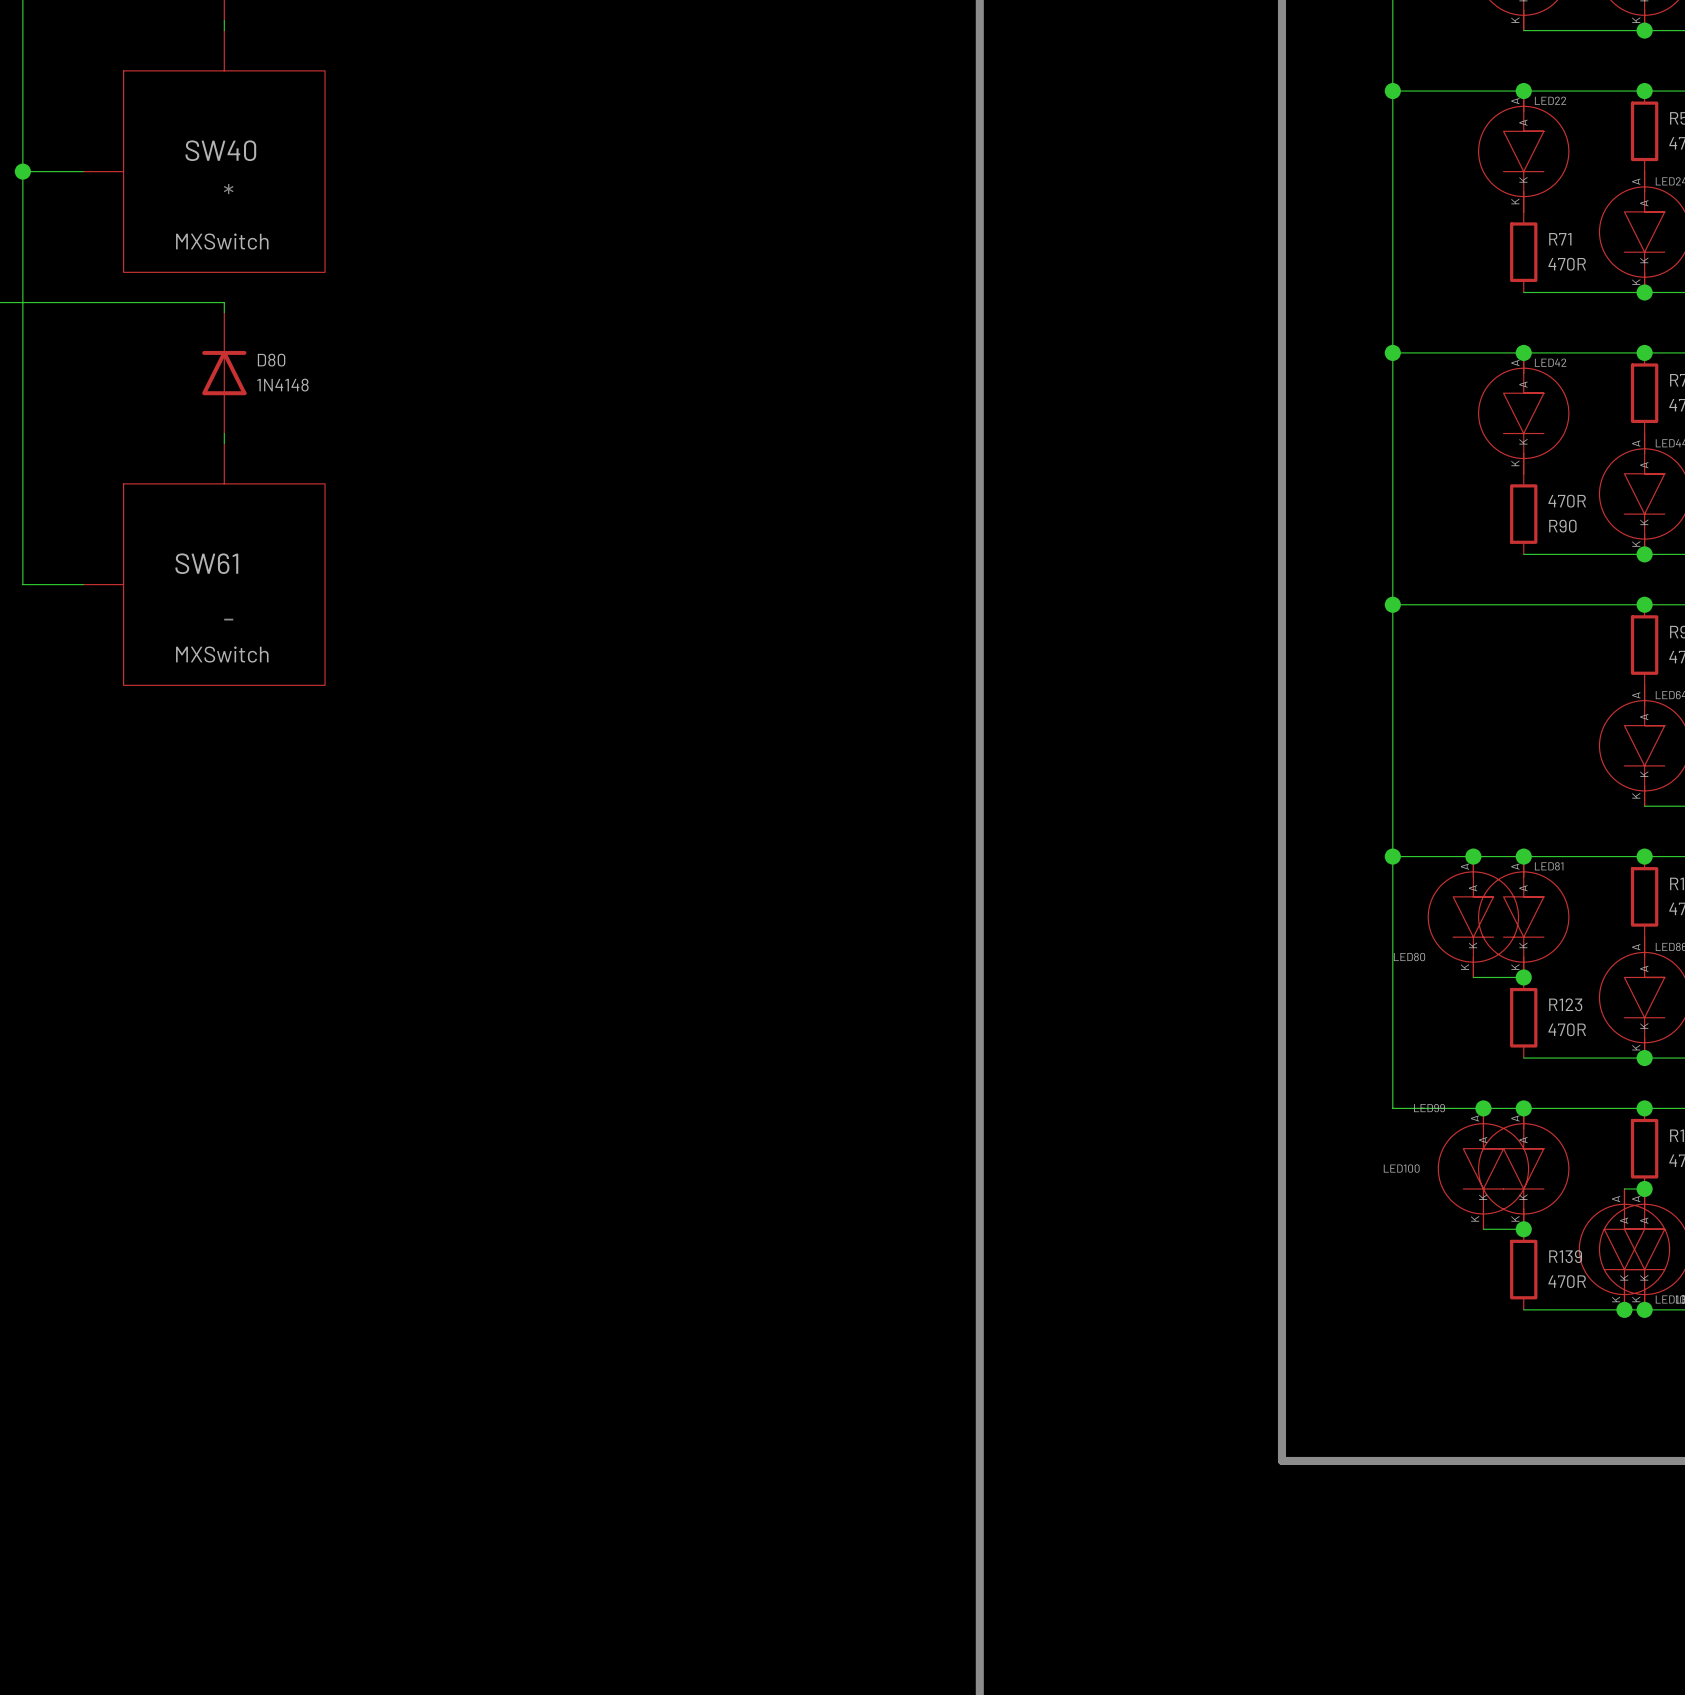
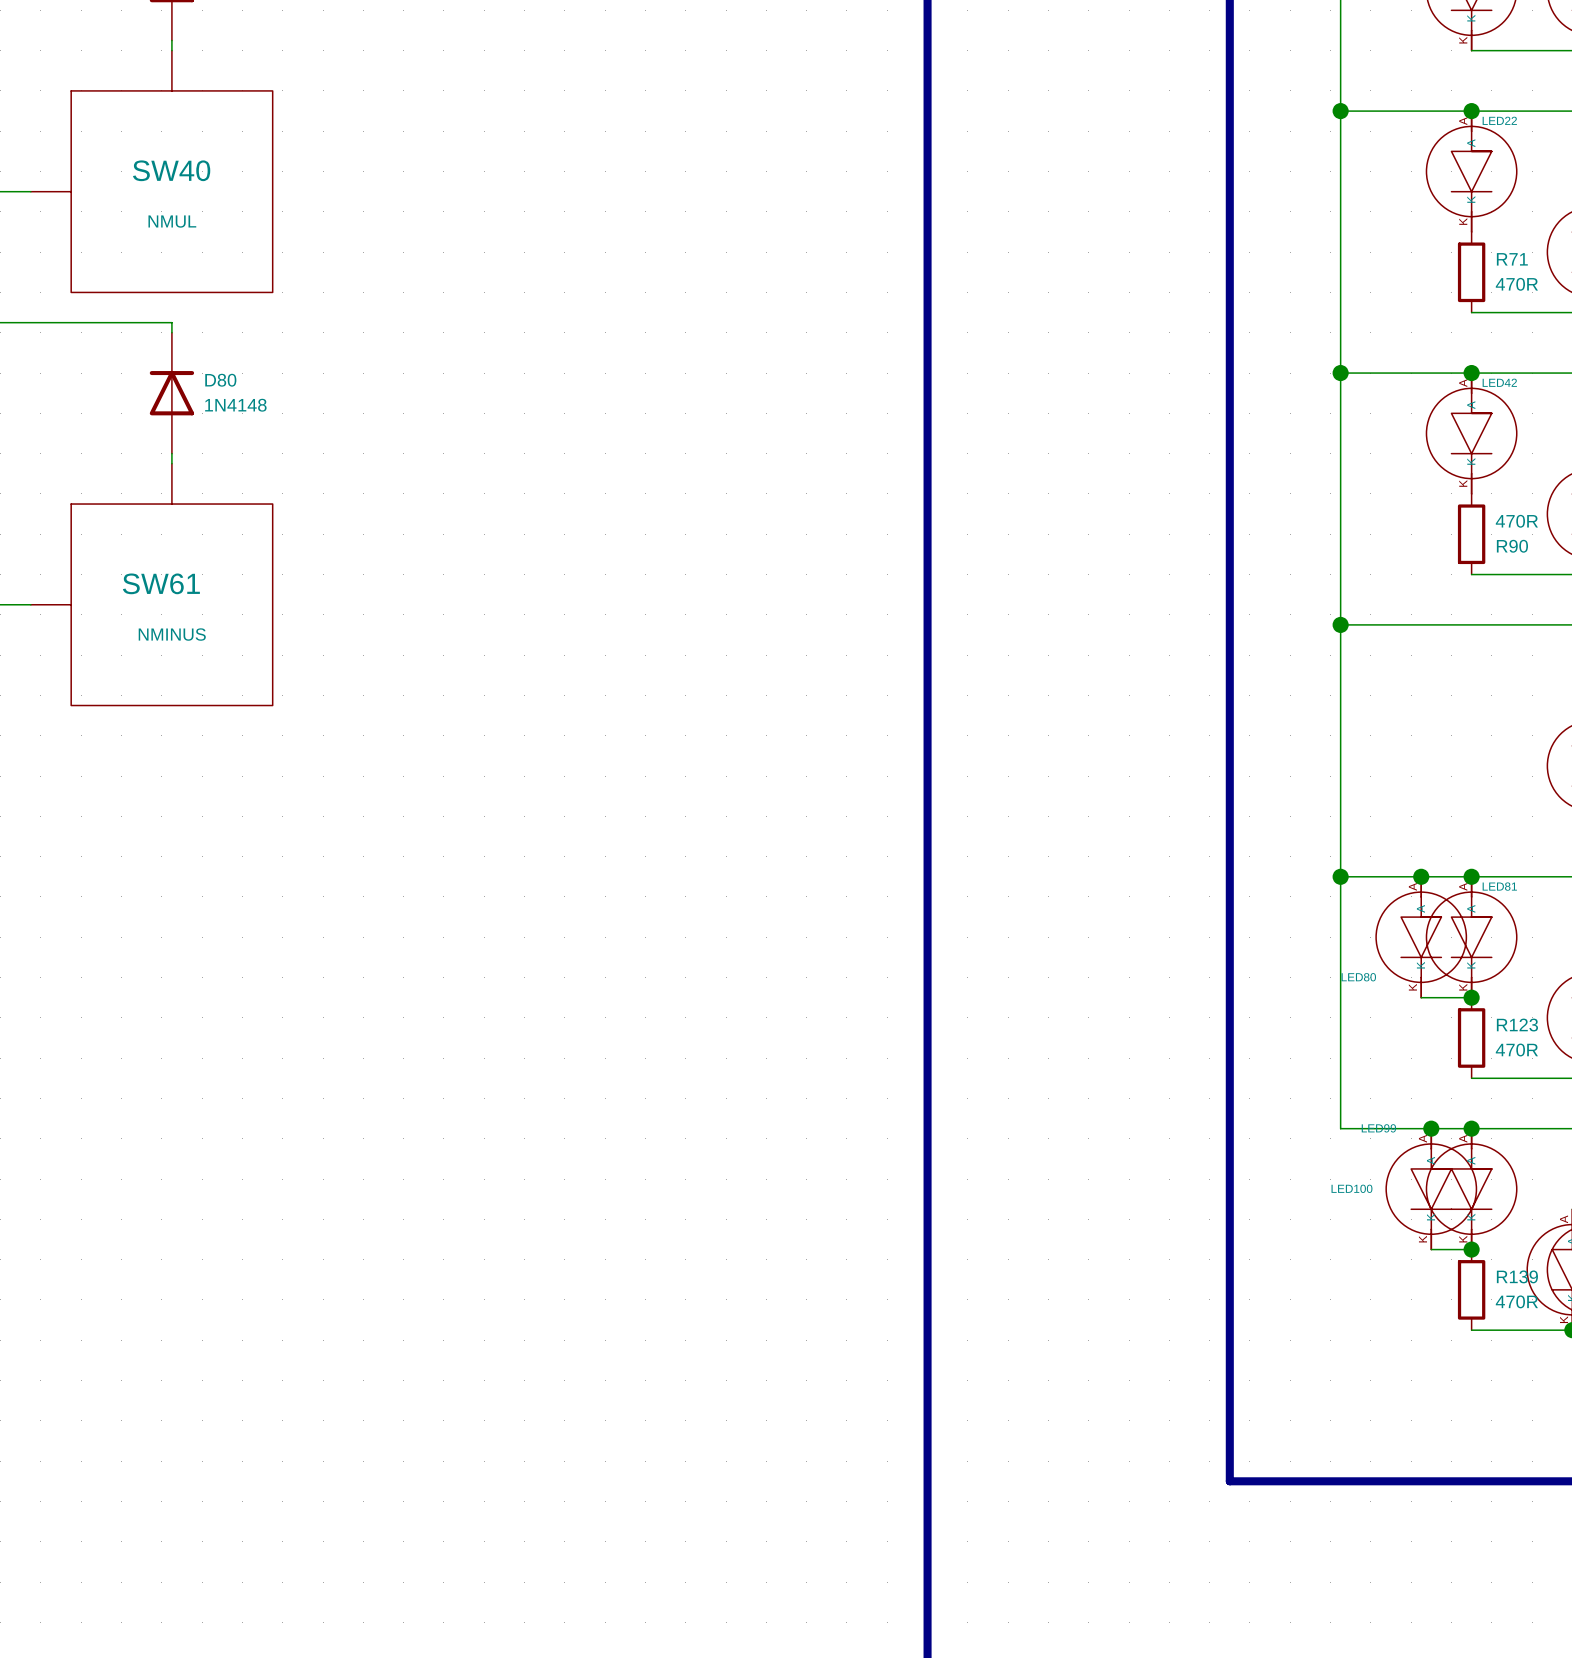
text: * (228, 189) -> none
SW40 text: none -> NMUL (172, 221)
SW40 value: MXSwitch (222, 241) -> none
SW61 text: none -> NMINUS (172, 634)
text: - (228, 619) -> none
SW61 value: MXSwitch (222, 654) -> none

